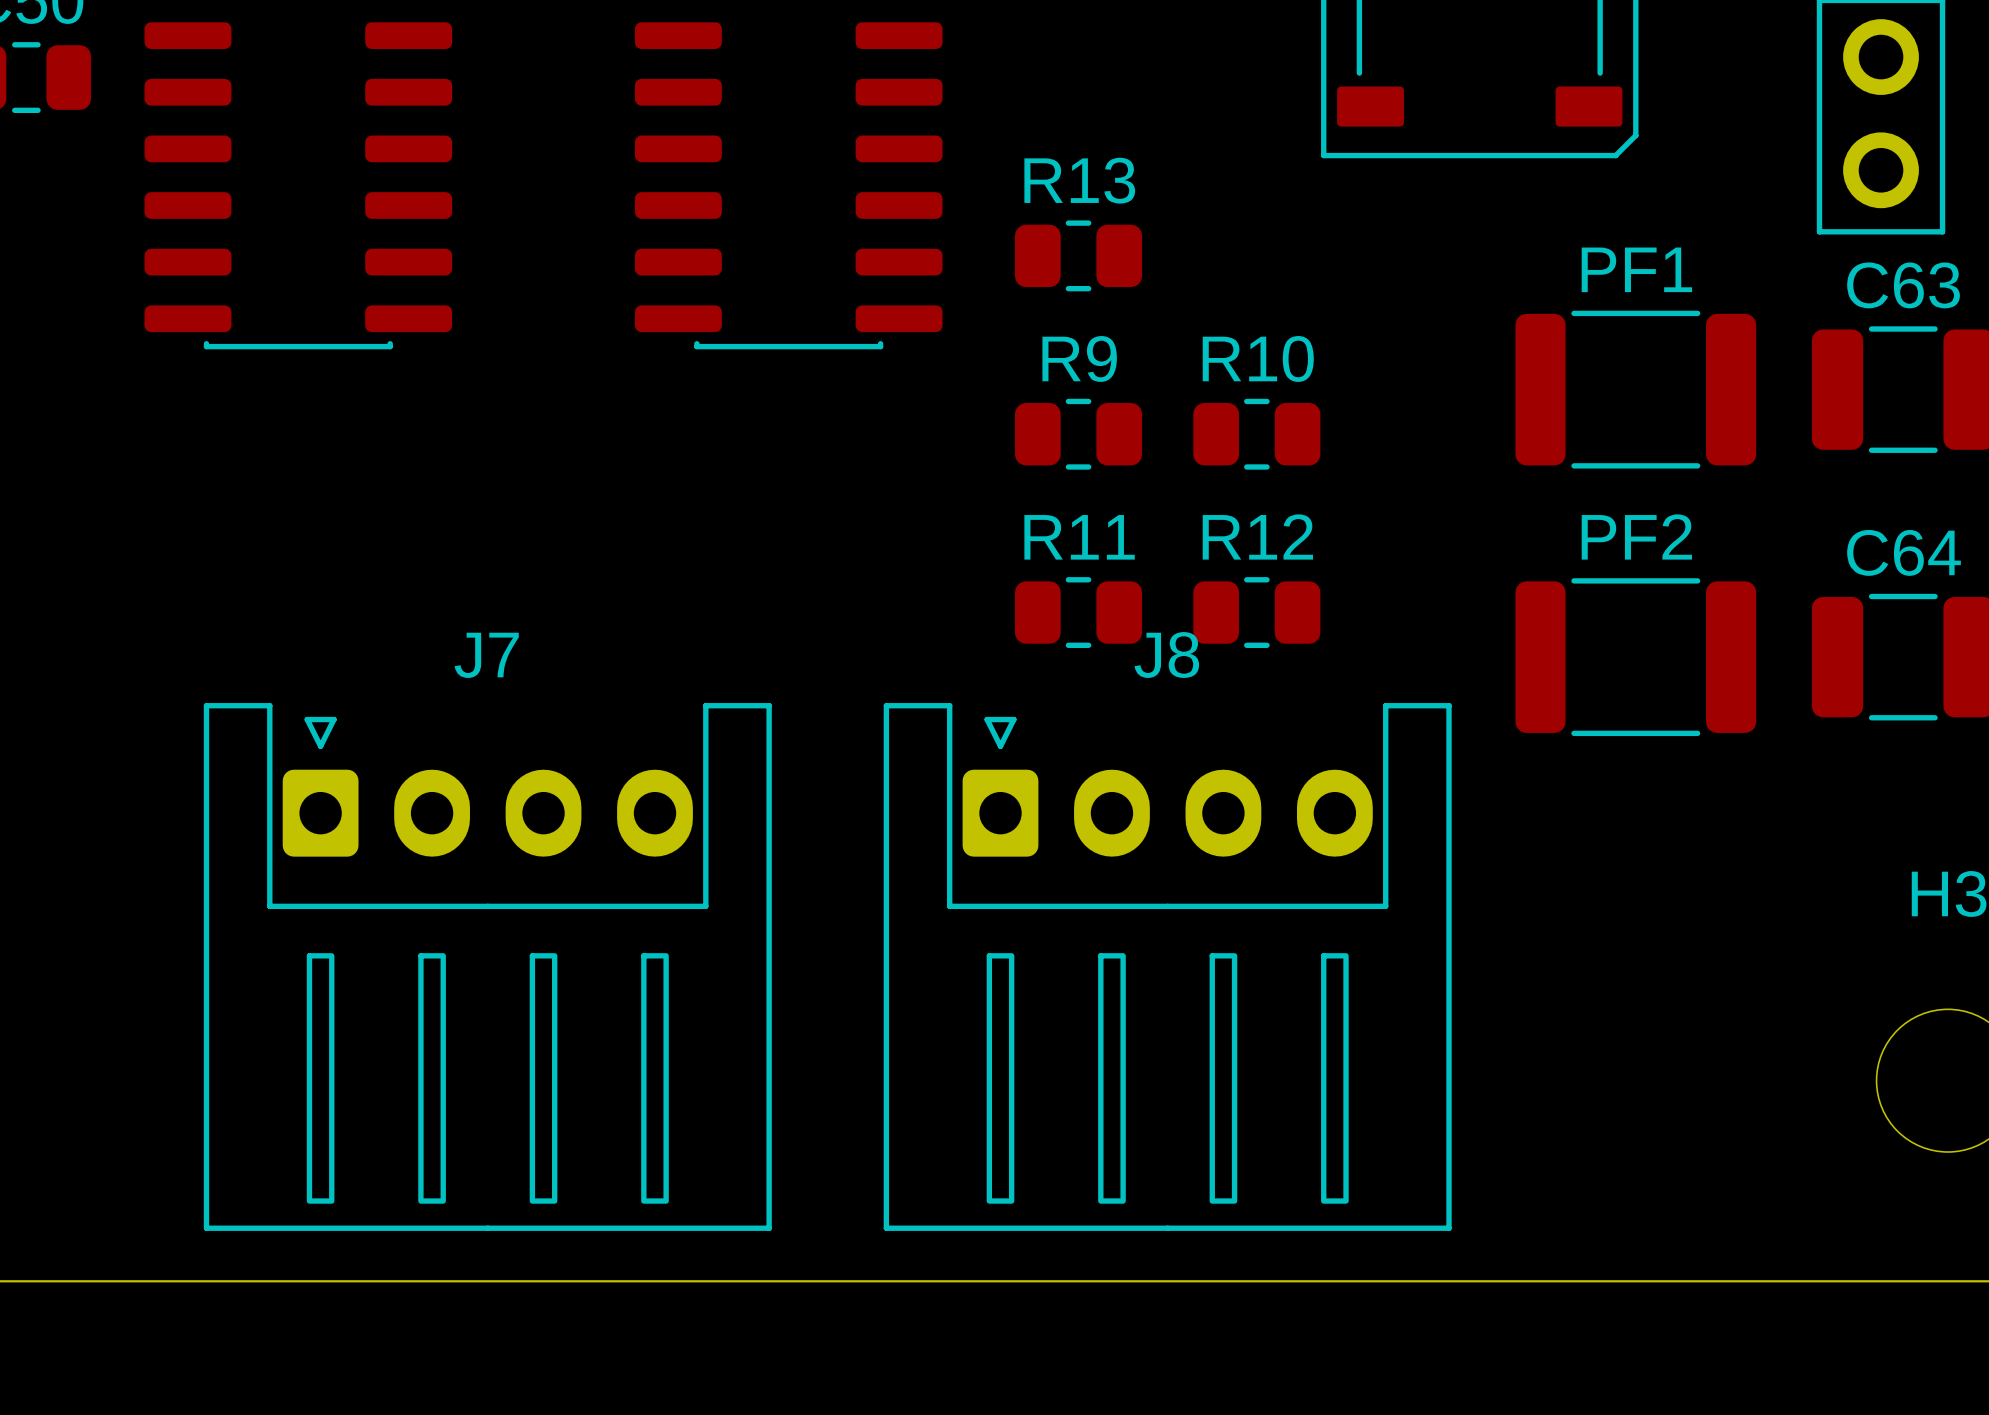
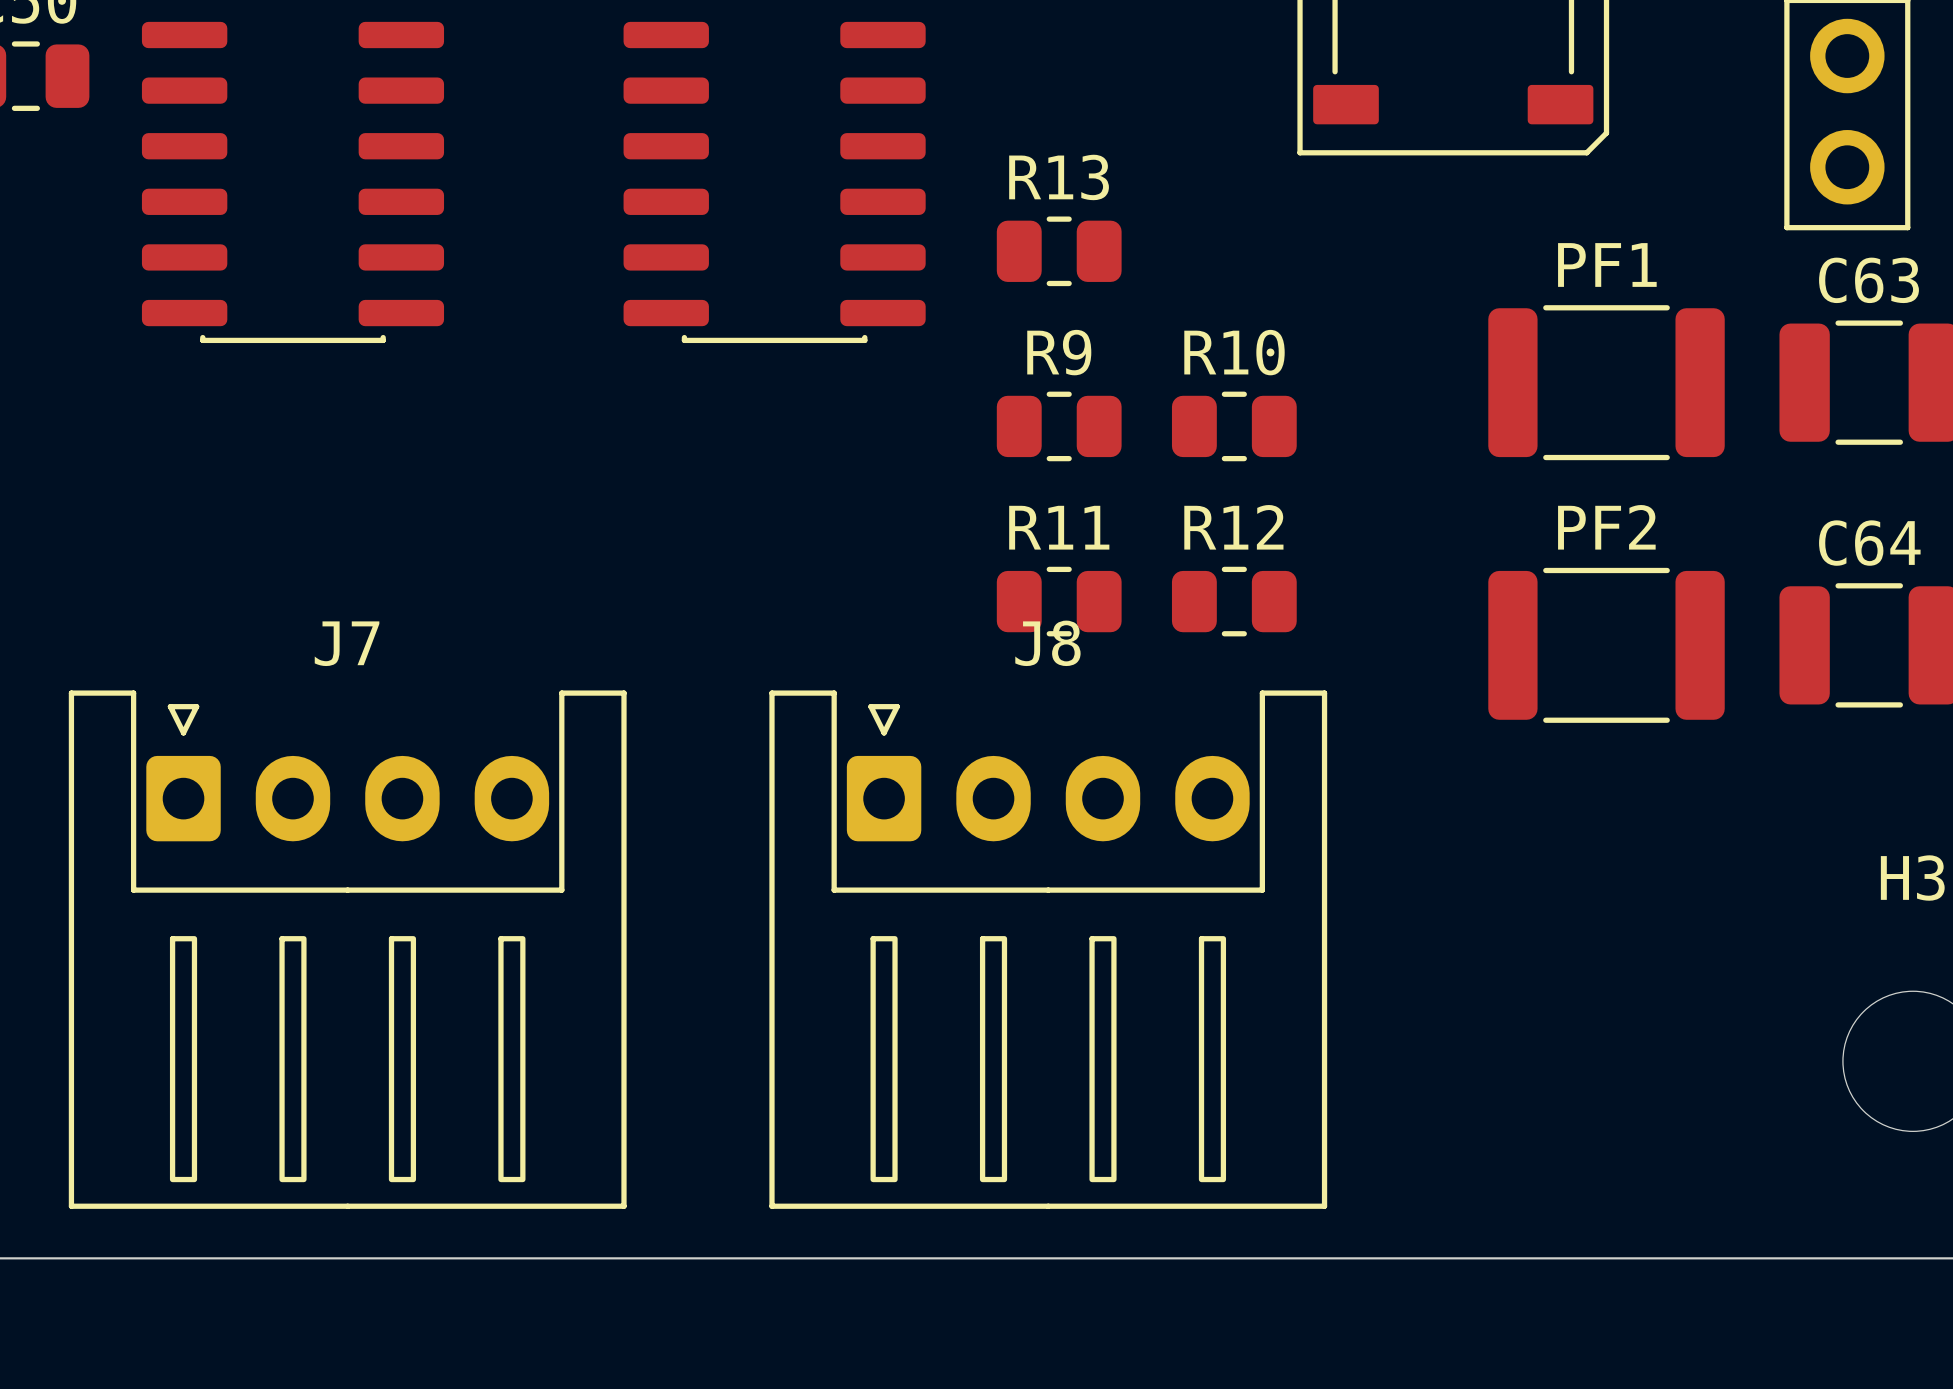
J7 position: (487, 966) -> (347, 949)
J8 position: (1167, 966) -> (1048, 949)

